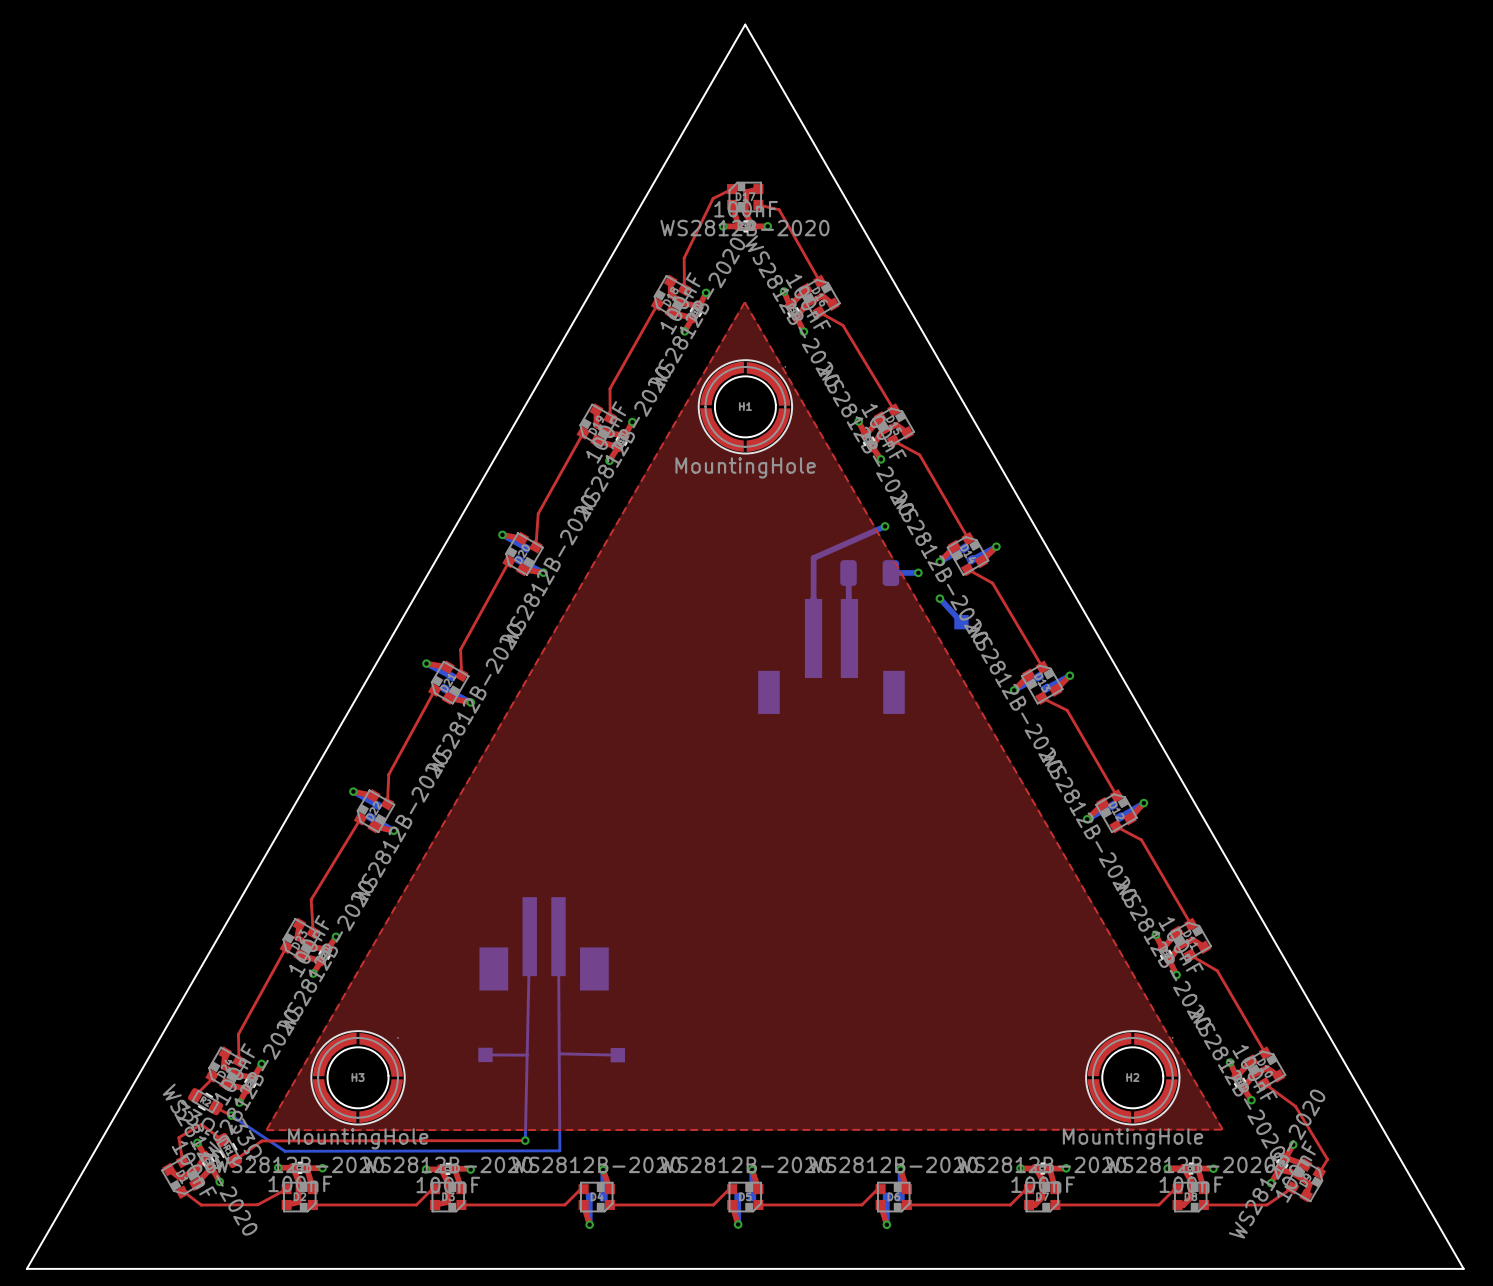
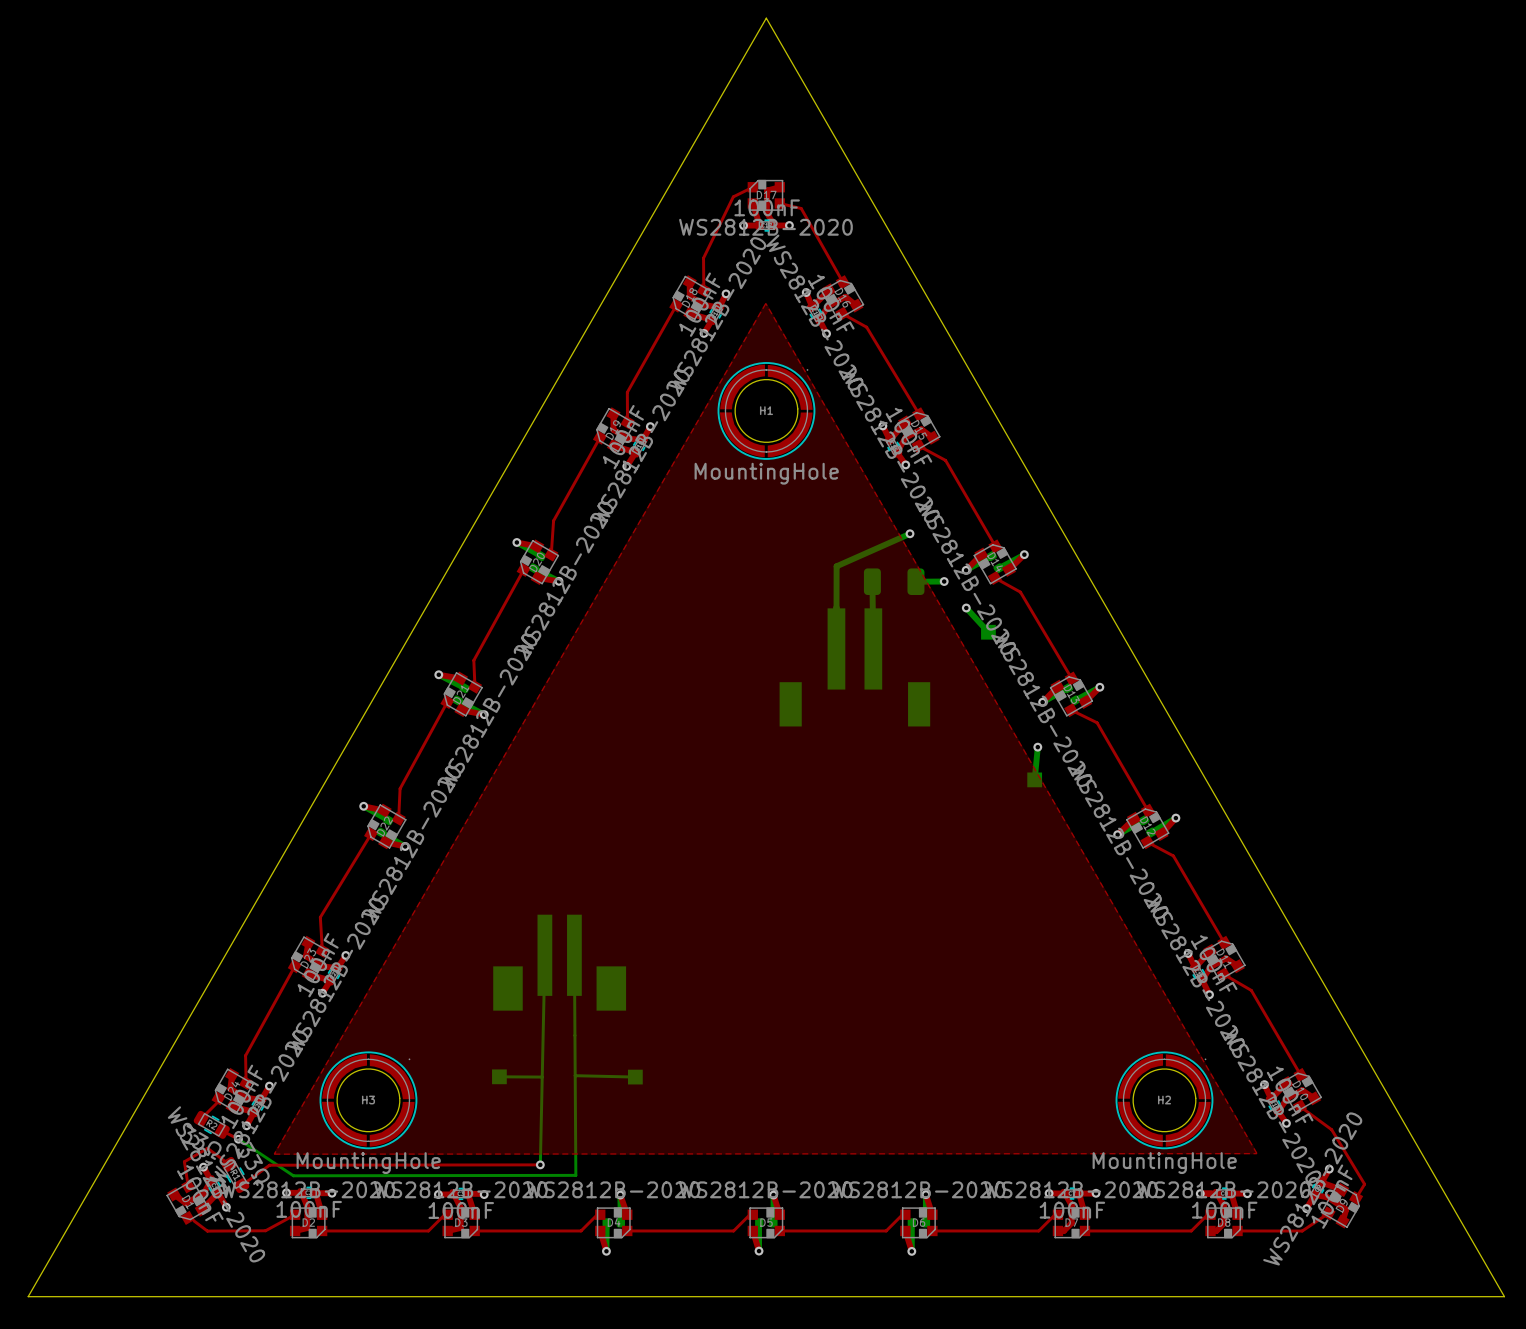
bottom track: none -> (1037, 747) (1034, 779)
via: none -> (1037, 747)
part: none -> (1034, 779)

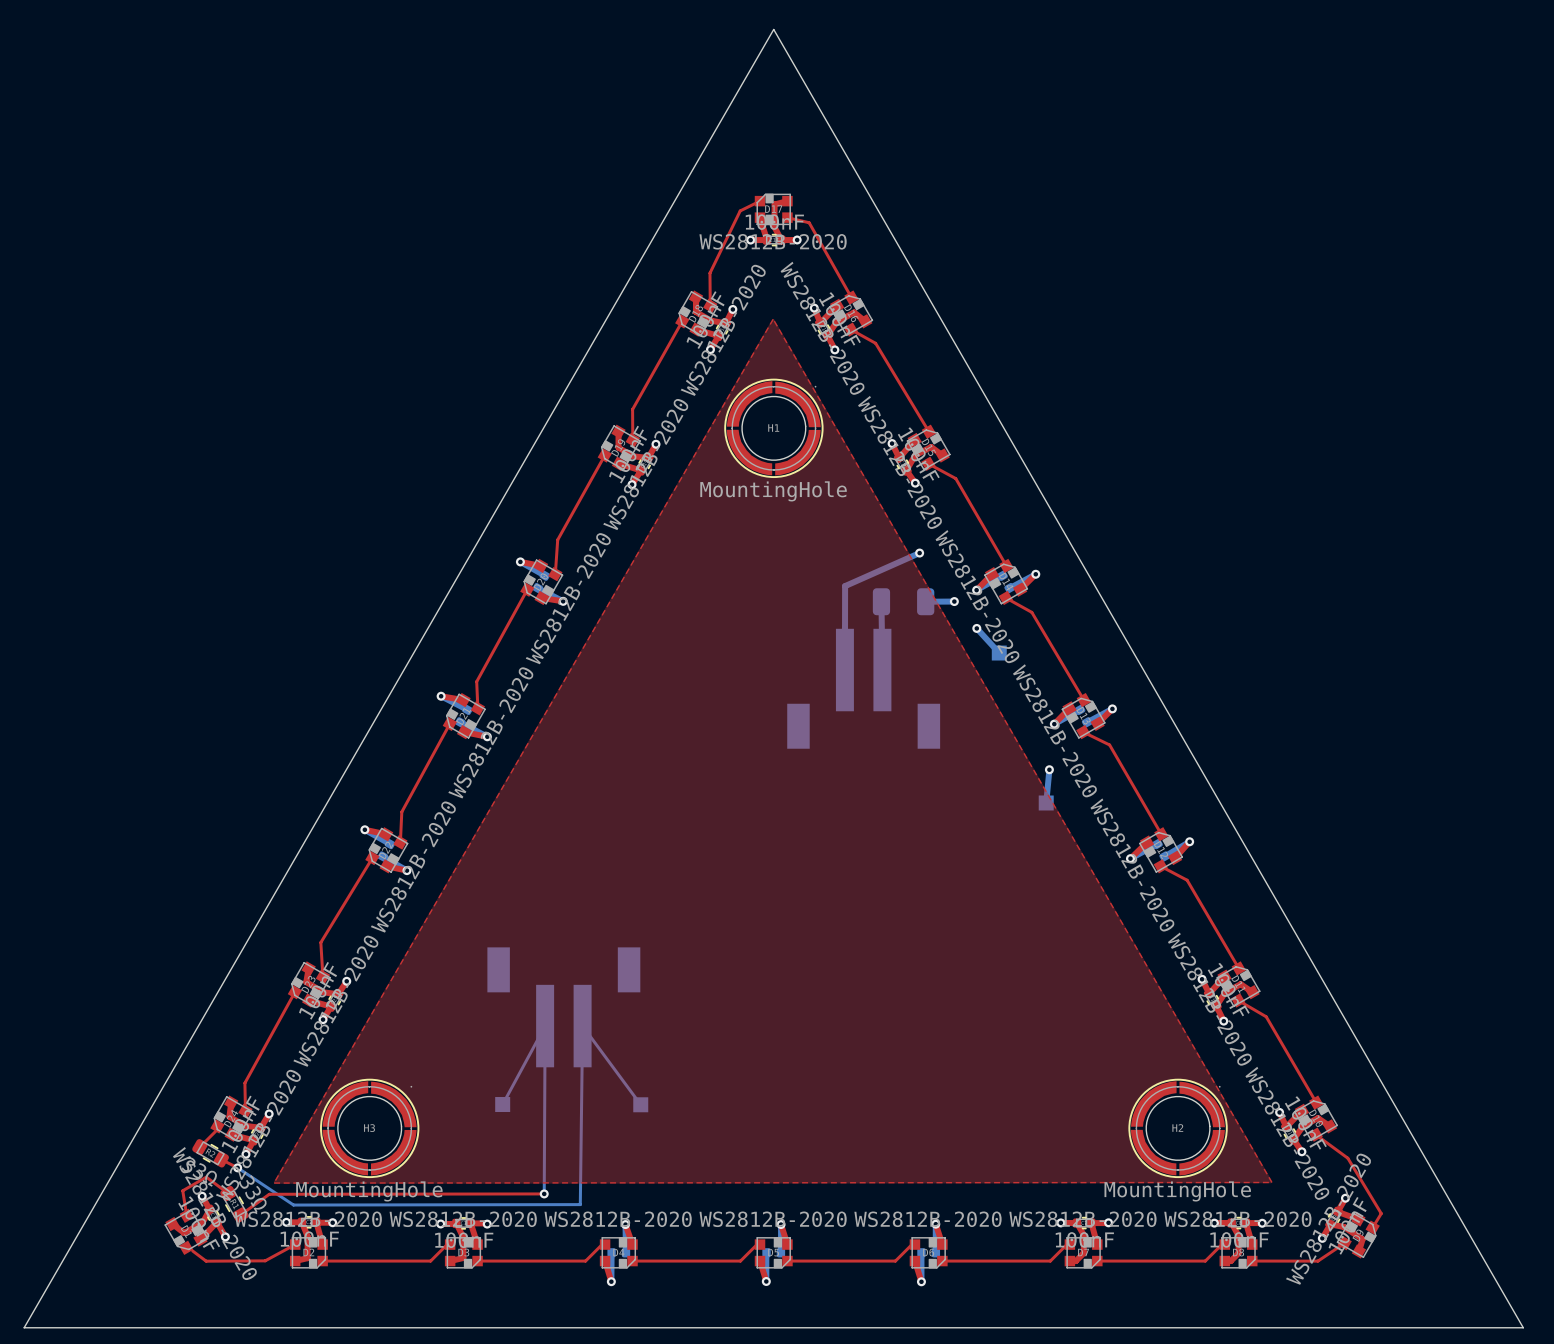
bottom track: (544, 955) (540, 1164) -> none
bottom track: (574, 955) (575, 1175) -> none
part: (559, 962) -> none
part: none -> (563, 1007)
bottom track: (575, 1075) (635, 1077) -> (580, 1204) (582, 1026) (640, 1104)
bottom track: (499, 1076) (542, 1077) -> (502, 1104) (545, 1026) (544, 1193)

